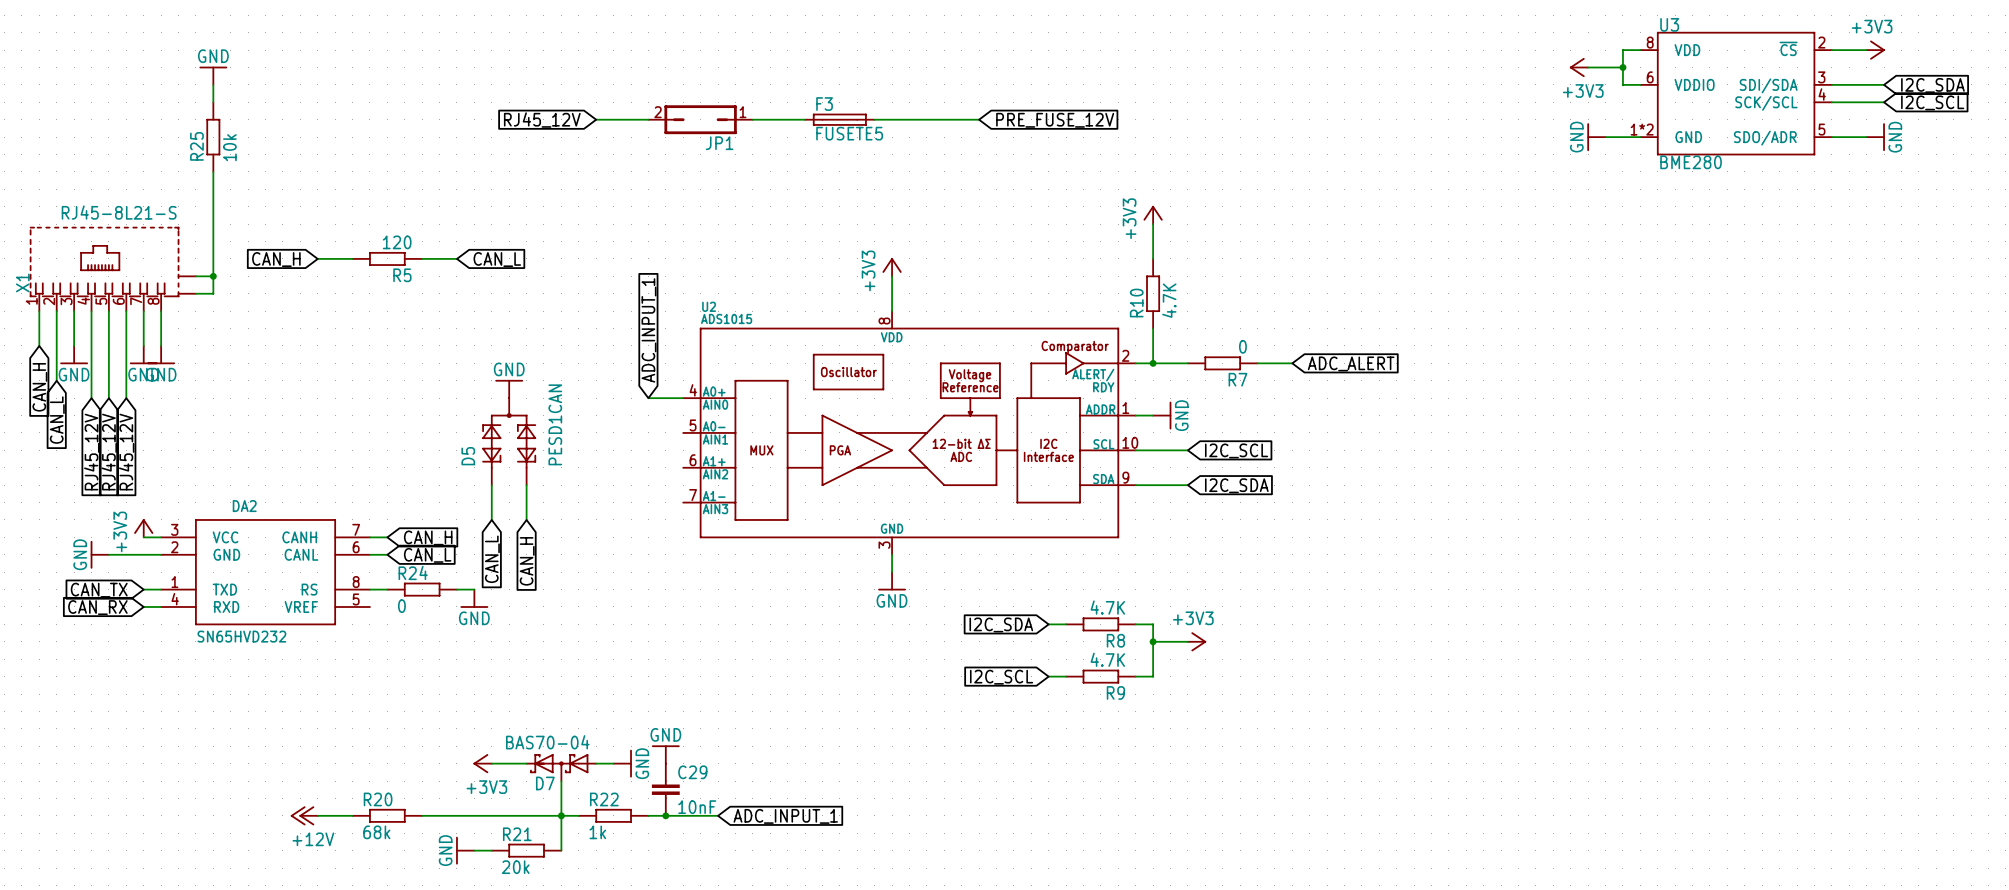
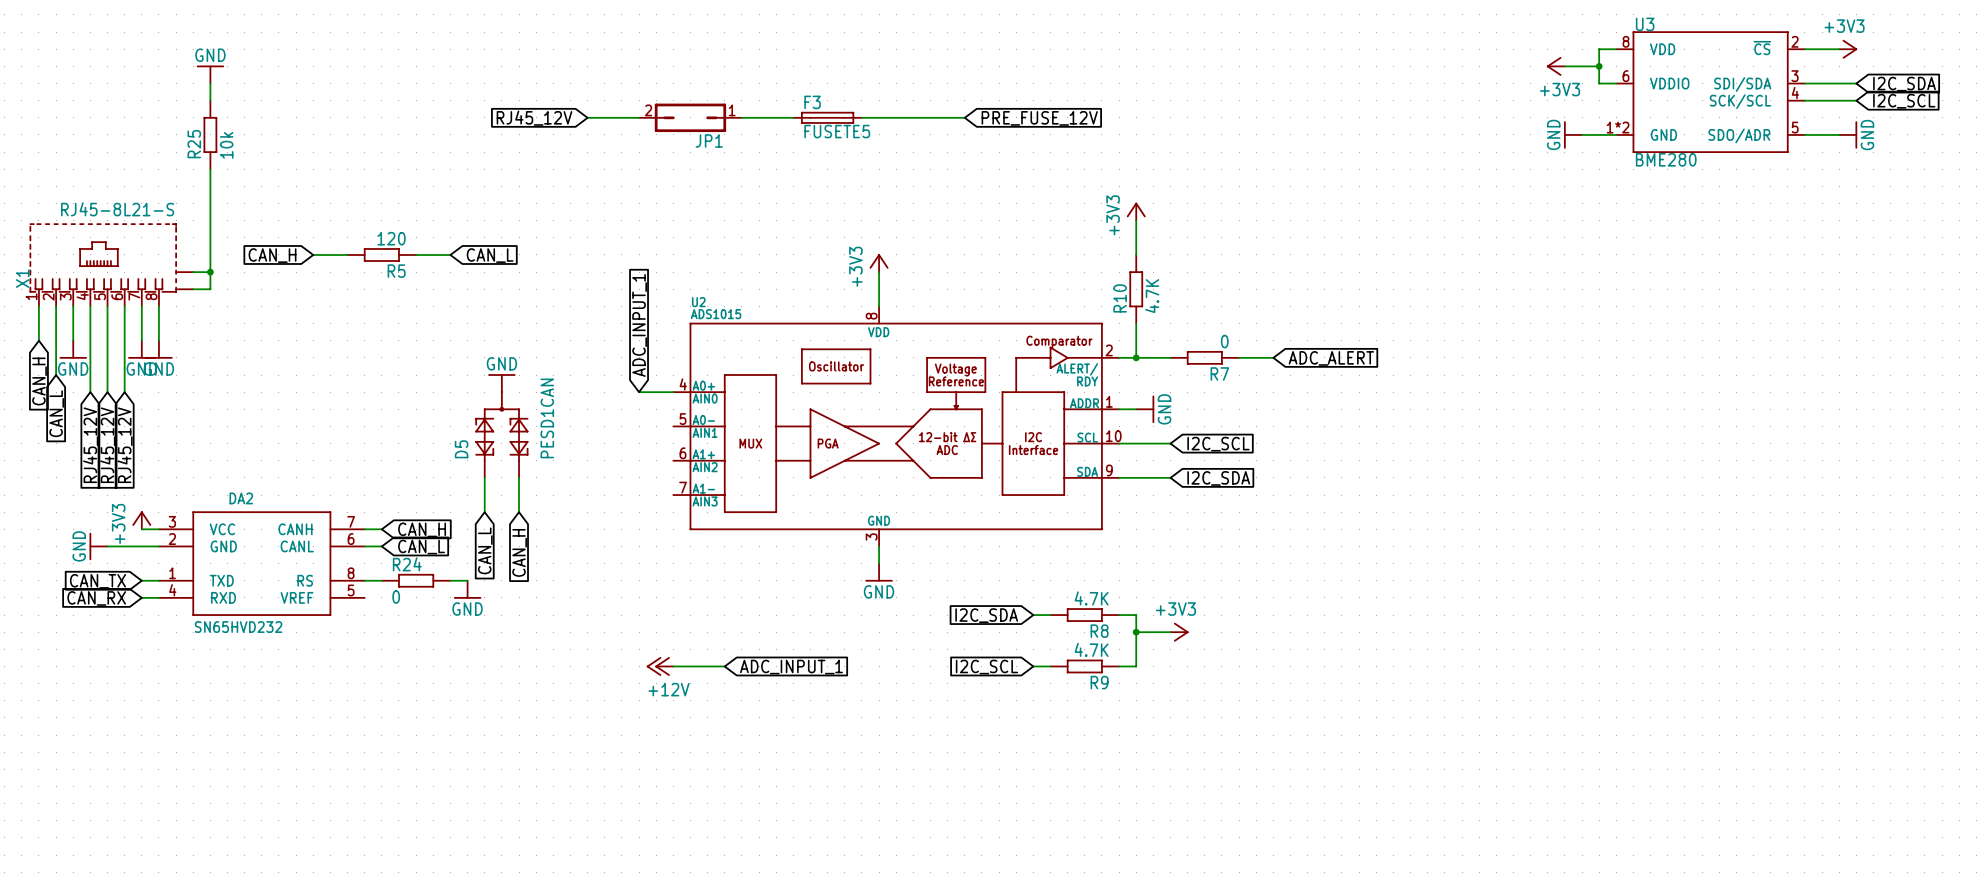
power symbol: none -> +12V (660, 666)
wire: none -> (673, 666) (724, 666)
power symbol: GND (665, 754) -> none
power symbol: +3V3 (482, 763) -> none
wire: (491, 763) (526, 763) -> none
wire: (596, 763) (613, 763) -> none
power symbol: GND (622, 763) -> none
D7: BAS70-04 (561, 767) -> none
wire: (561, 781) (561, 850) -> none
C29: 10nF (665, 789) -> none
power symbol: +12V (304, 815) -> none
wire: (317, 815) (352, 815) -> none
R20: 68k (387, 815) -> none
wire: (422, 815) (578, 815) -> none
junction: (561, 815) -> none
R22: 1k (613, 815) -> none
wire: (648, 815) (718, 815) -> none
junction: (665, 815) -> none
global label position: ADC_INPUT_1 (785, 816) -> ADC_INPUT_1 (791, 667)
power symbol: GND (465, 850) -> none
wire: (474, 850) (491, 850) -> none
R21: 20k (526, 850) -> none

